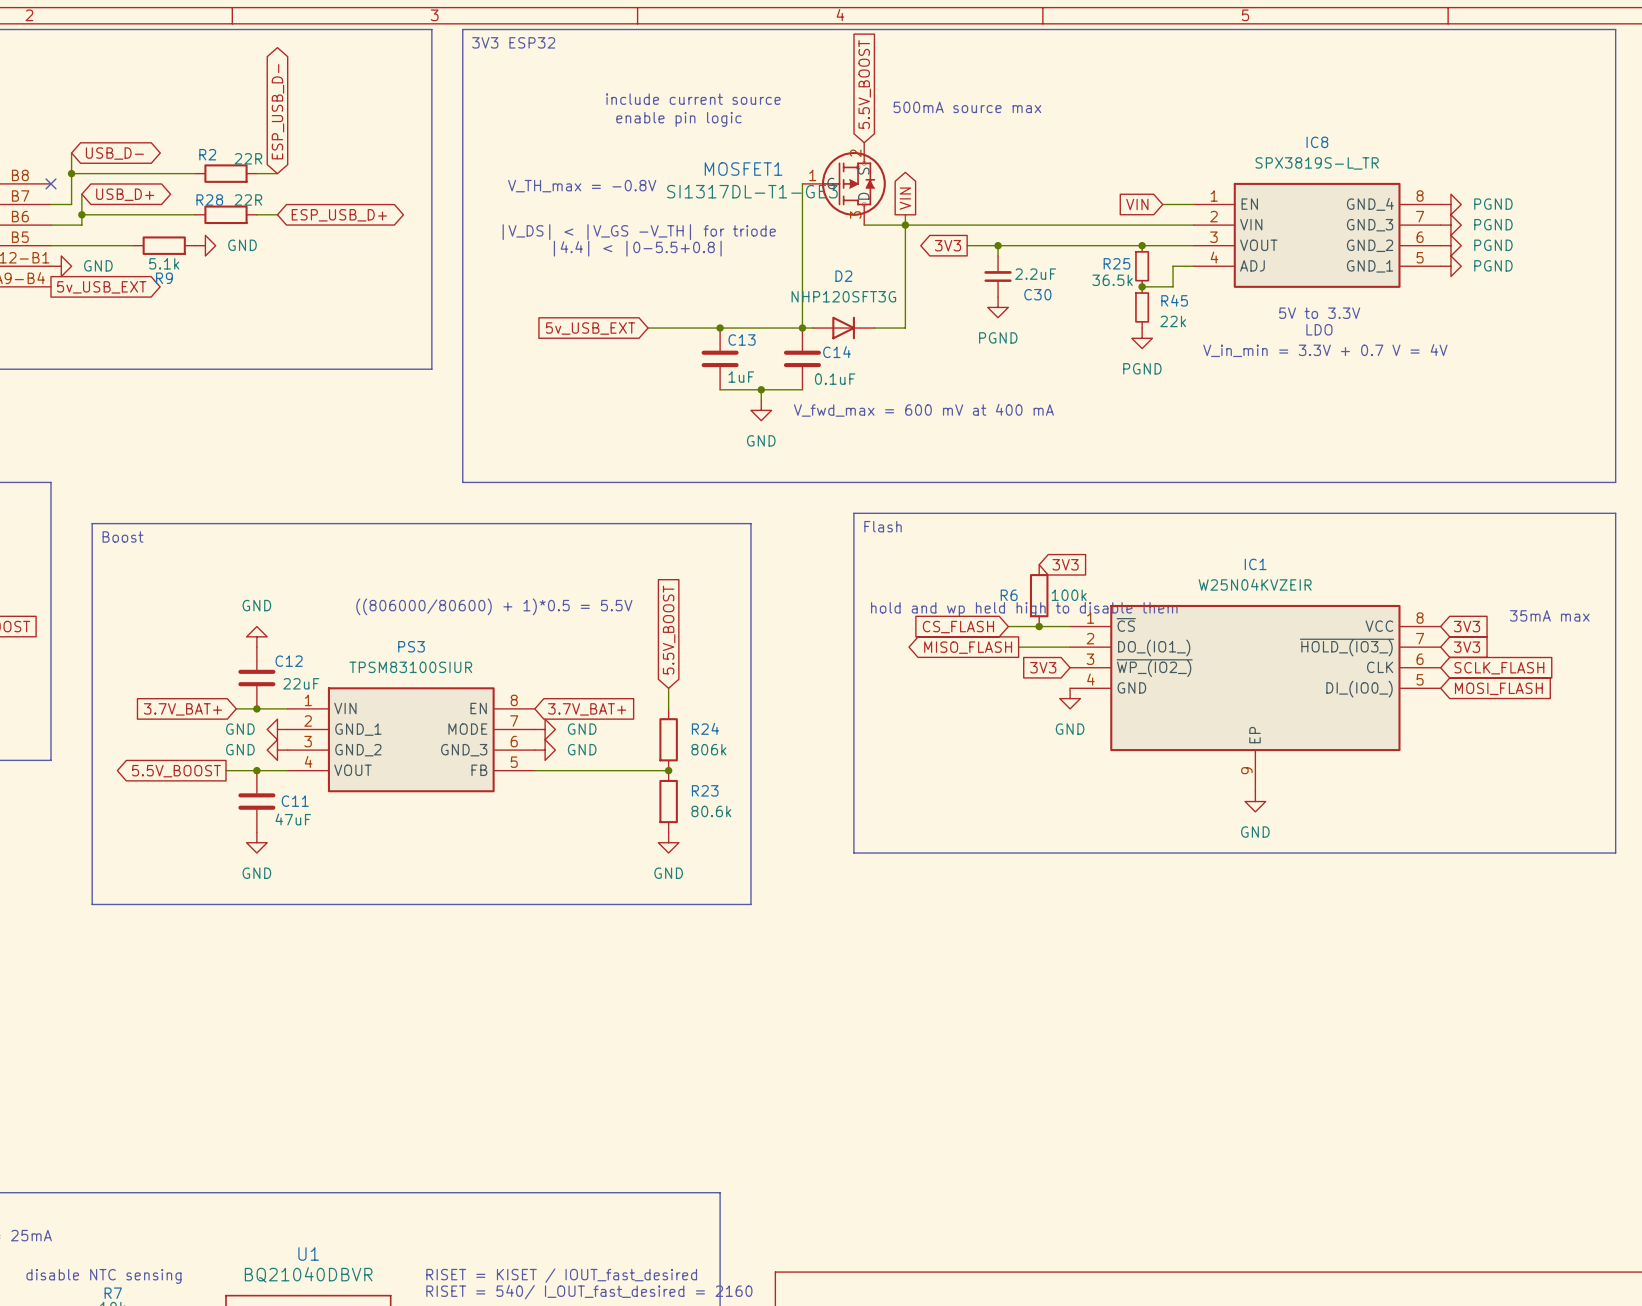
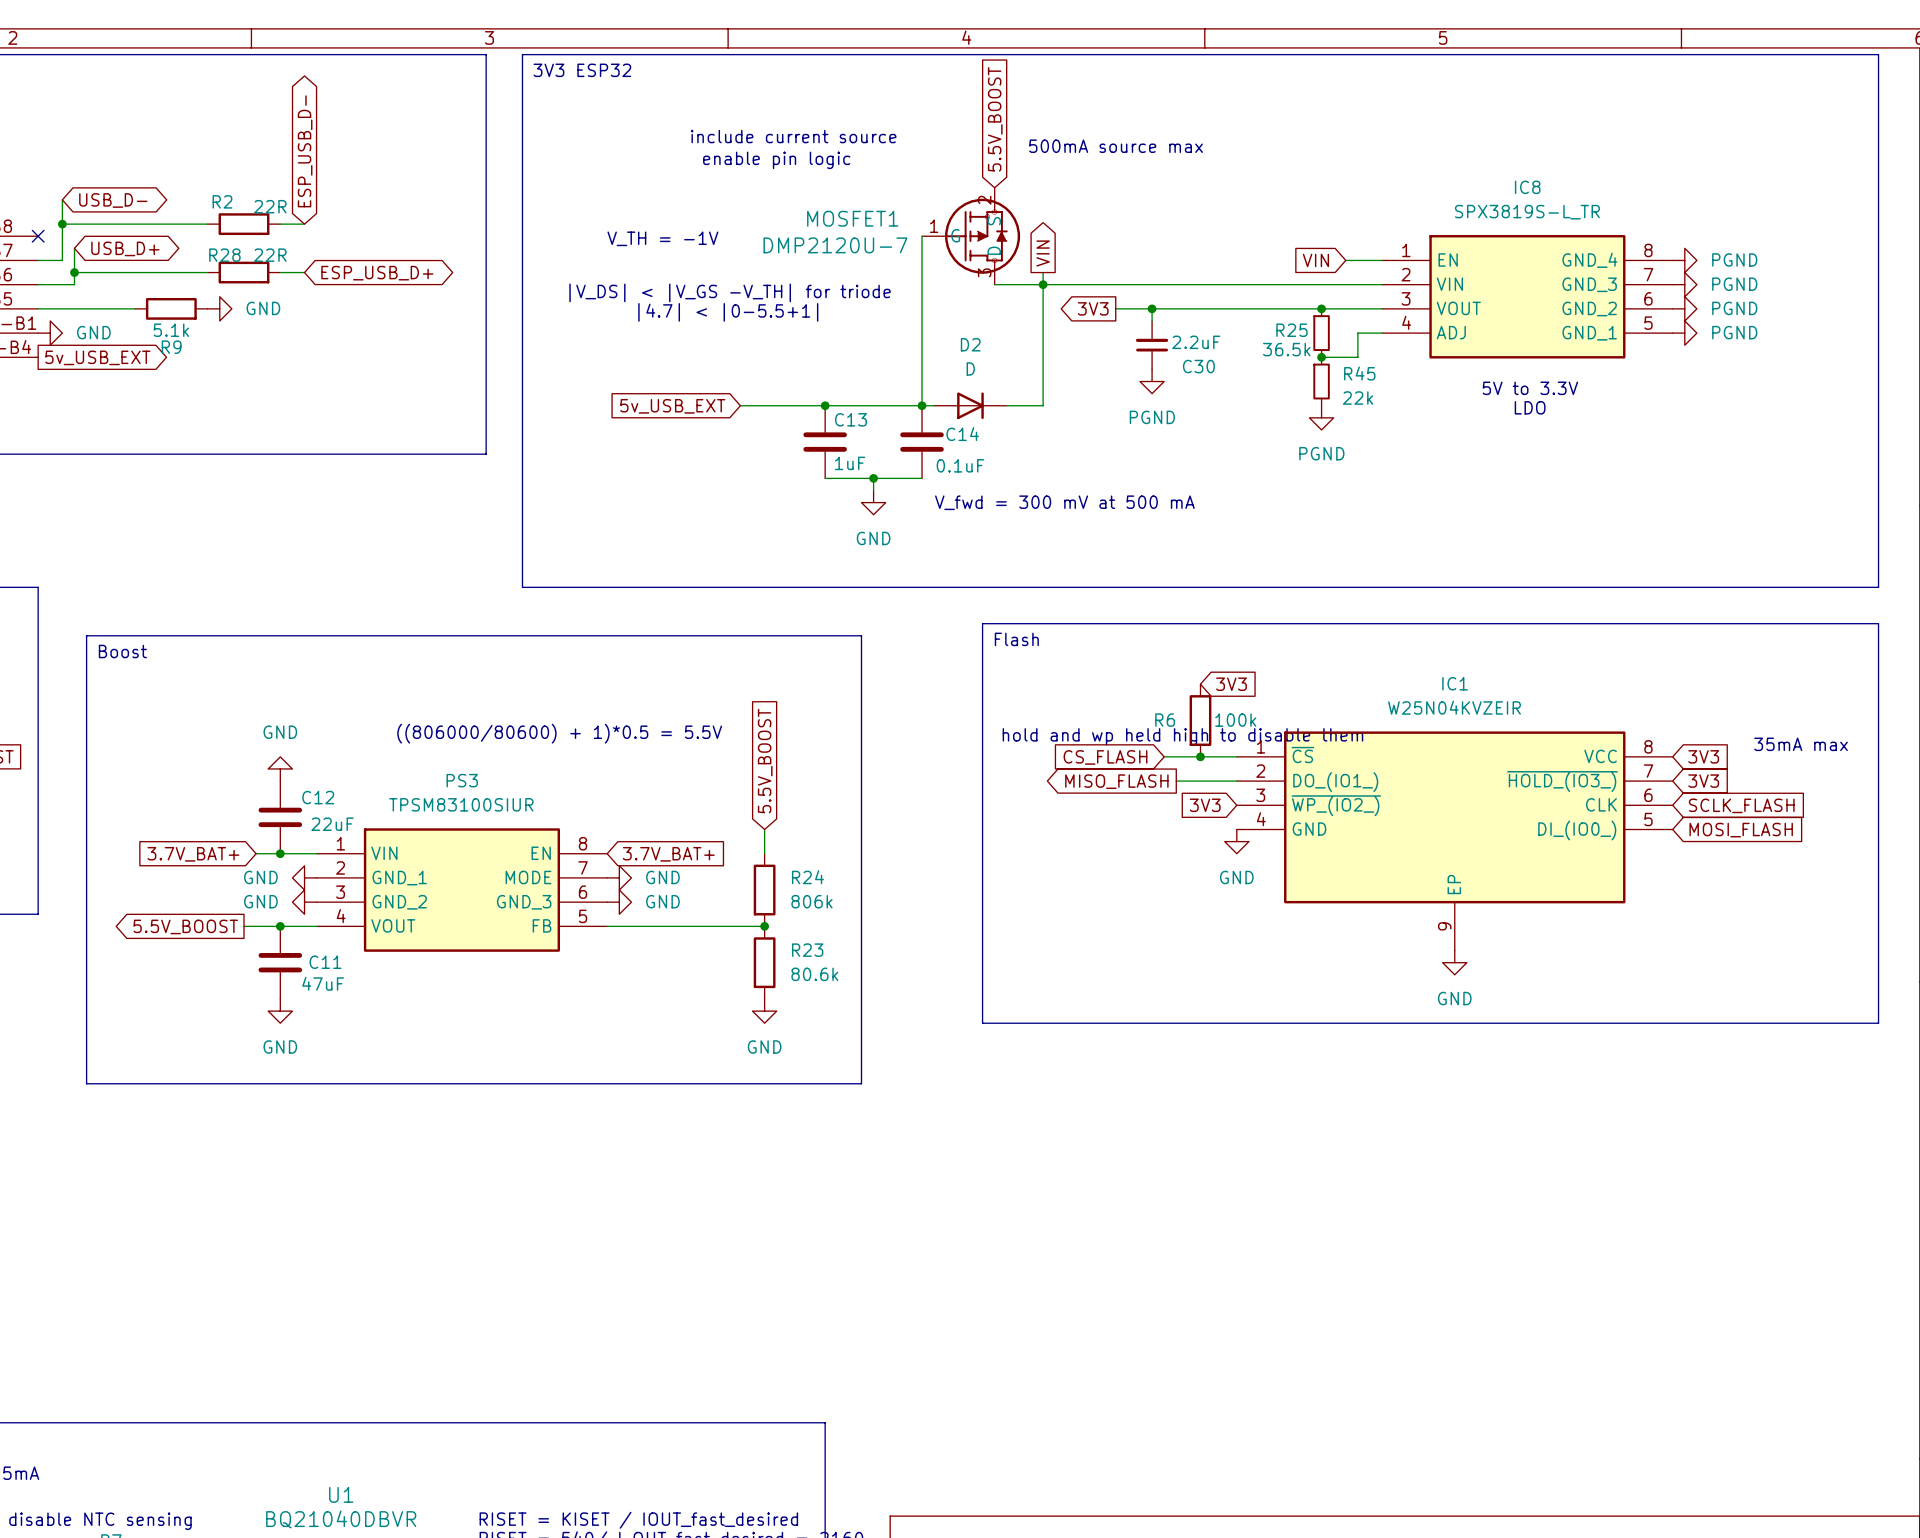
text: V_TH_max = -0.8V (582, 186) -> V_TH = -1V (662, 238)
MOSFET1 value: SI1317DL-T1-GE3 (752, 191) -> DMP2120U-7 (835, 245)
text: |4.4| < |0-5.5+0.8| (637, 248) -> |4.7| < |0-5.5+1| (728, 312)
D2 value: NHP120SFT3G (843, 296) -> D (970, 368)
text: V_in_min = 3.3V + 0.7 V = 4V (1325, 350) -> none
text: V_fwd_max = 600 mV at 400 mA (923, 410) -> V_fwd = 300 mV at 500 mA (1064, 502)

